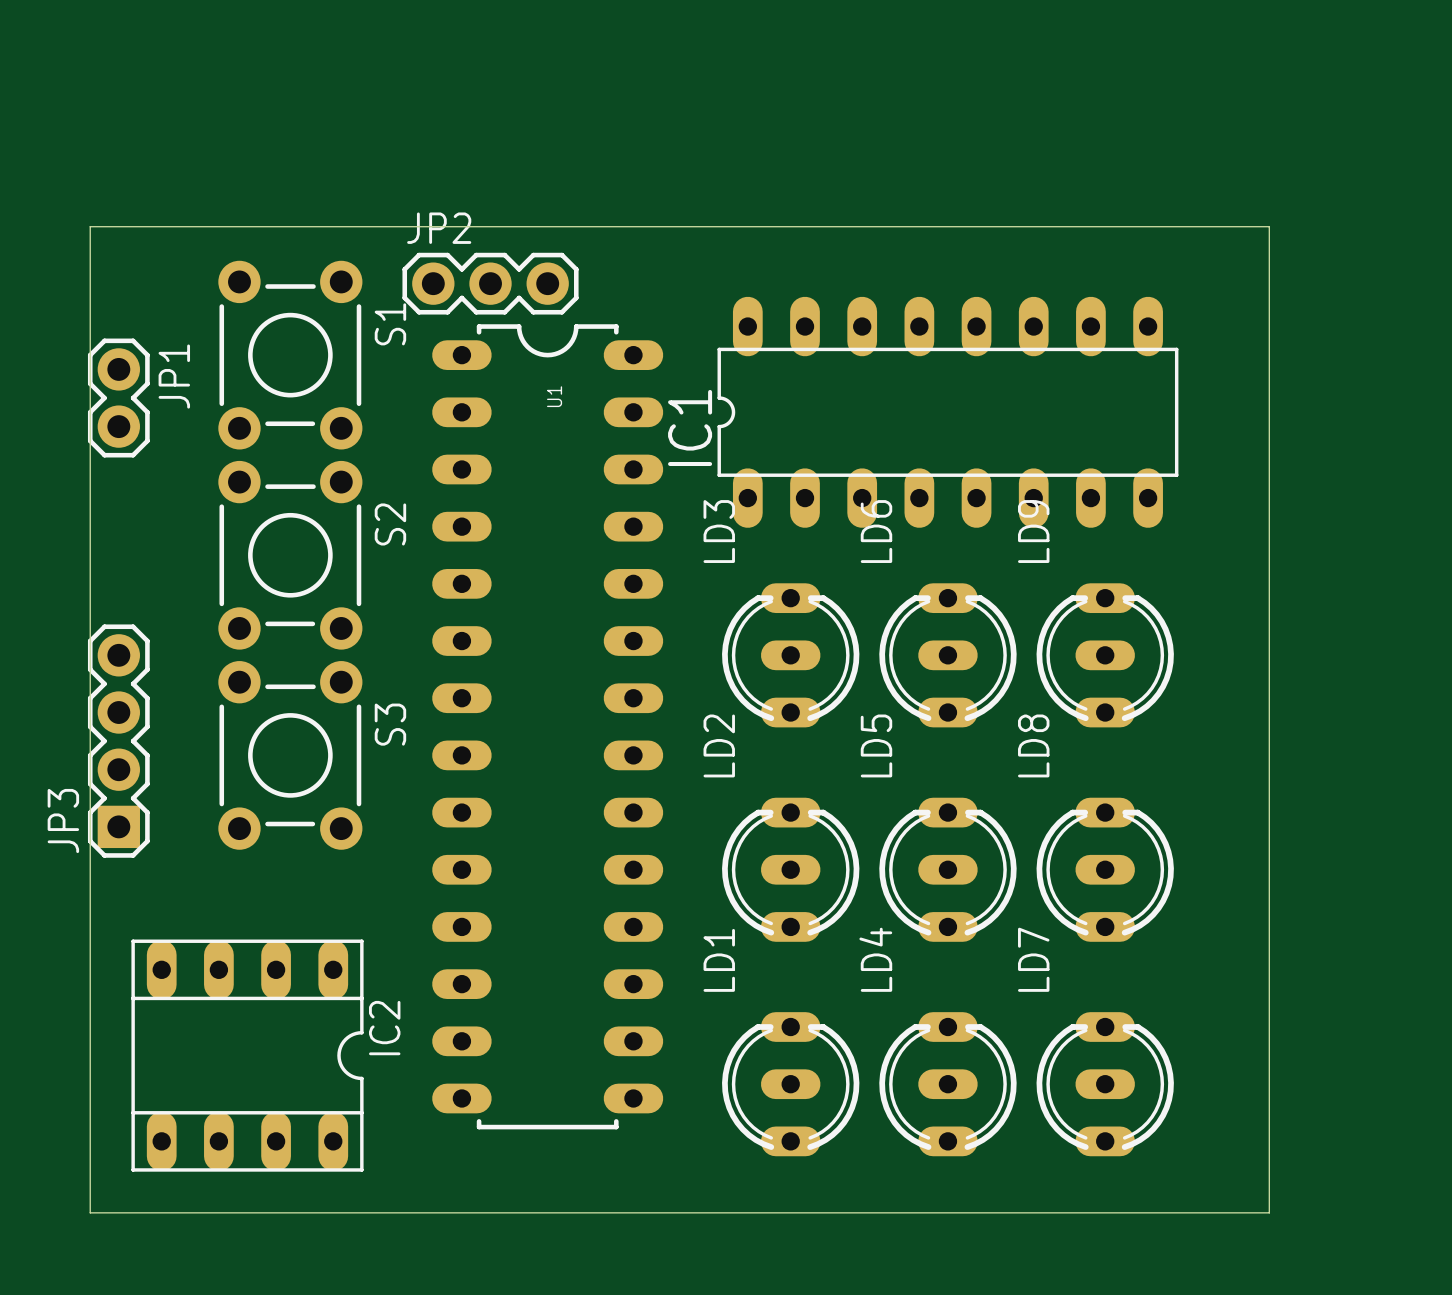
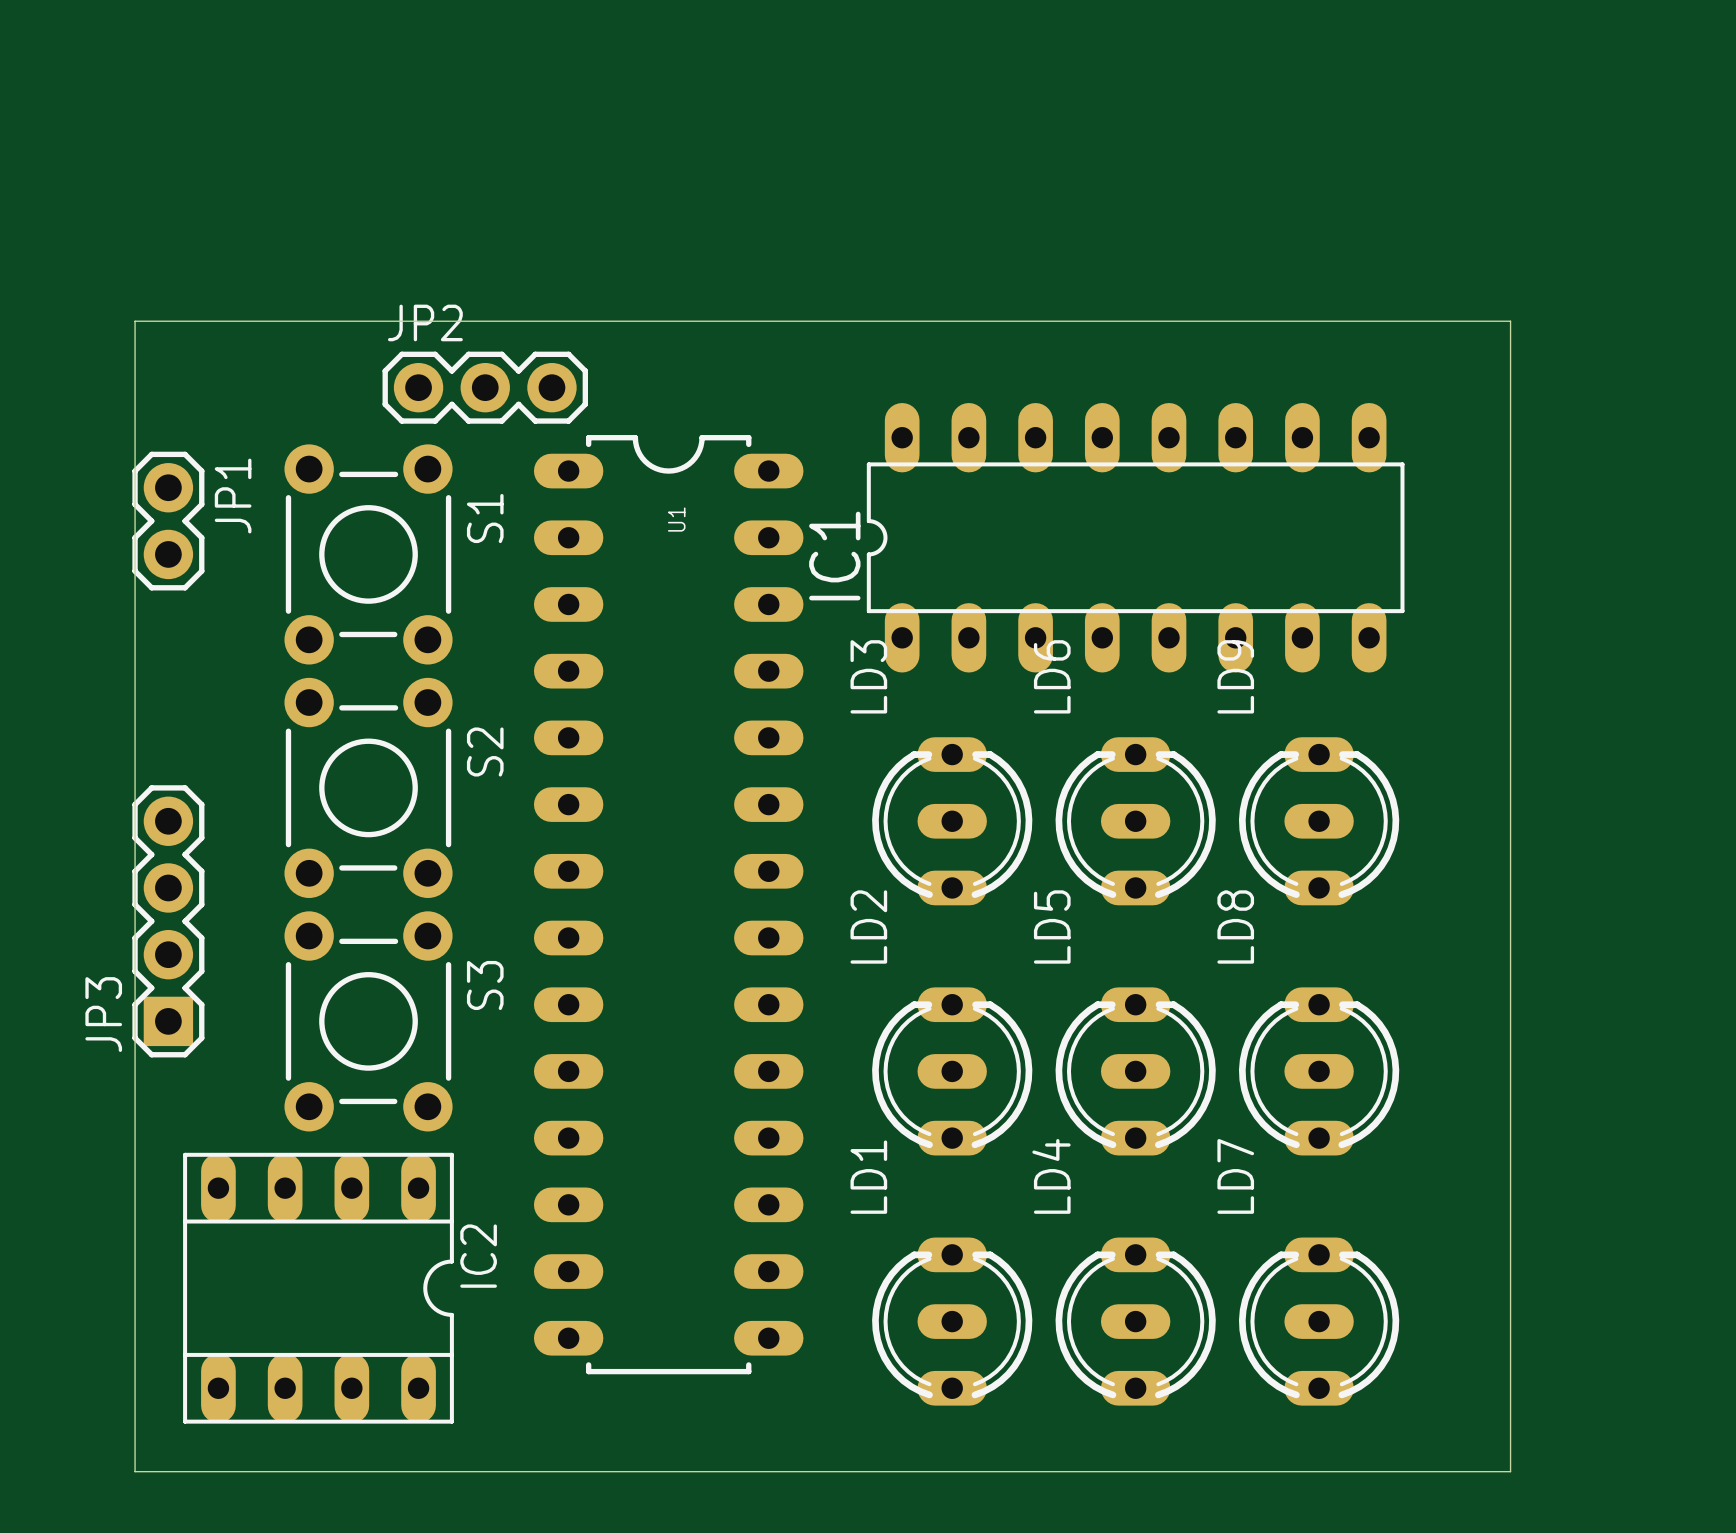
JP2 position: (490, 283) -> (485, 387)
S1 position: (290, 355) -> (368, 554)
S2 position: (290, 555) -> (368, 787)
S3 position: (290, 755) -> (368, 1021)

